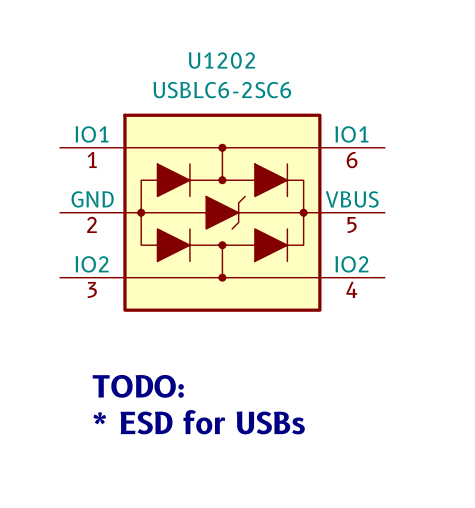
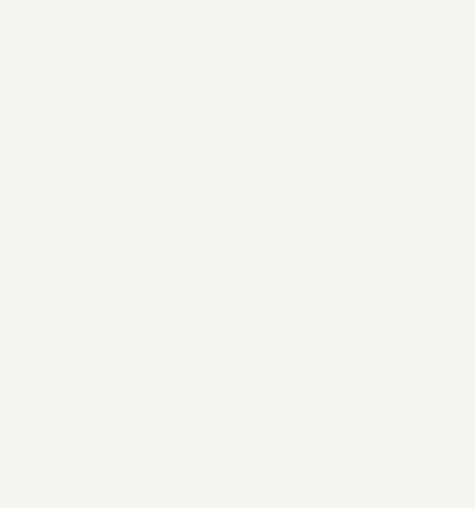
U1202: USBLC6-2SC6 (222, 212) -> none
text: TODO: (138, 386) -> none
text: * ESD for USBs (199, 422) -> none

